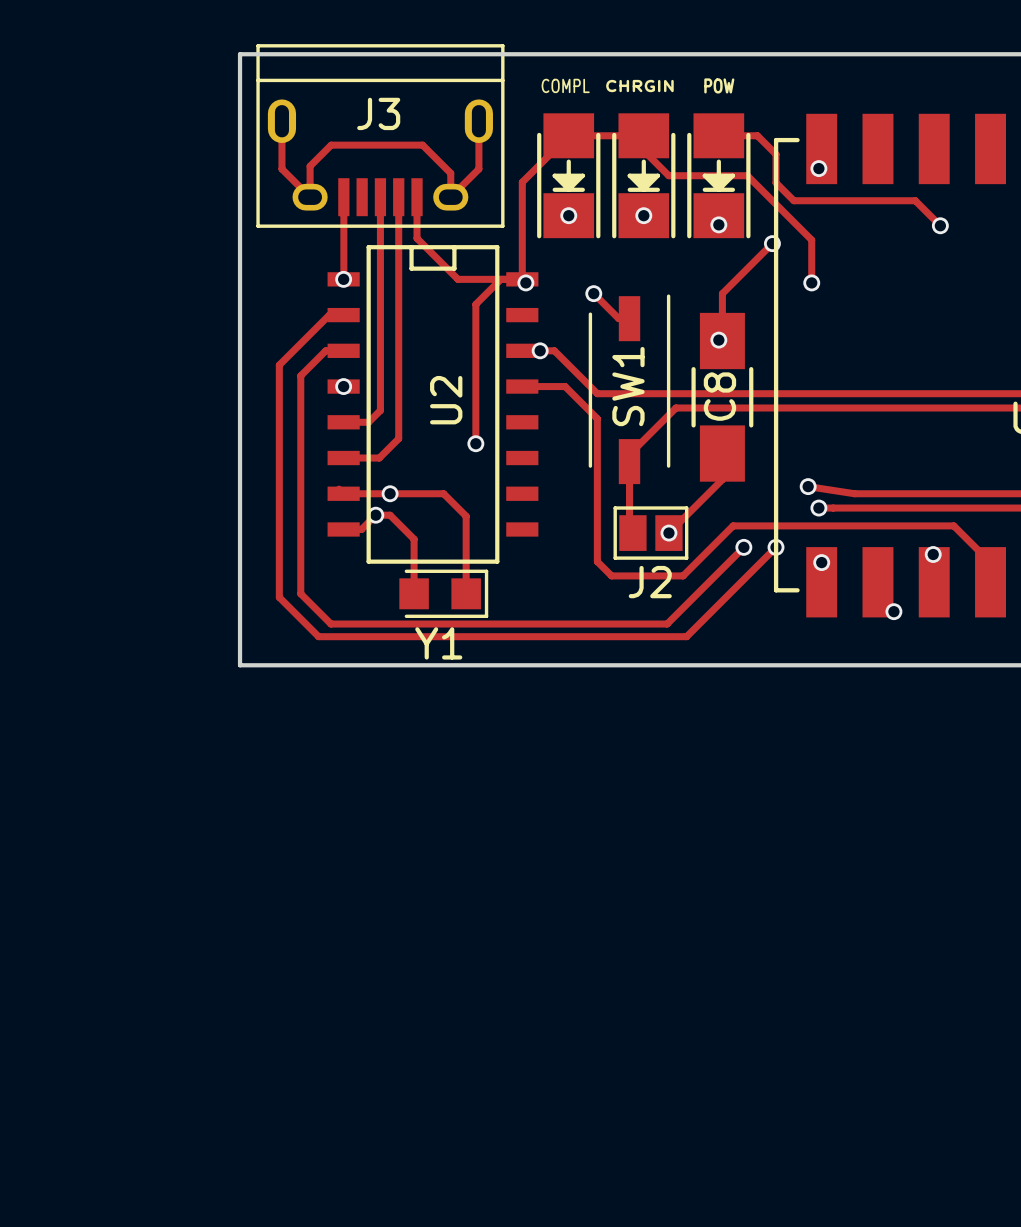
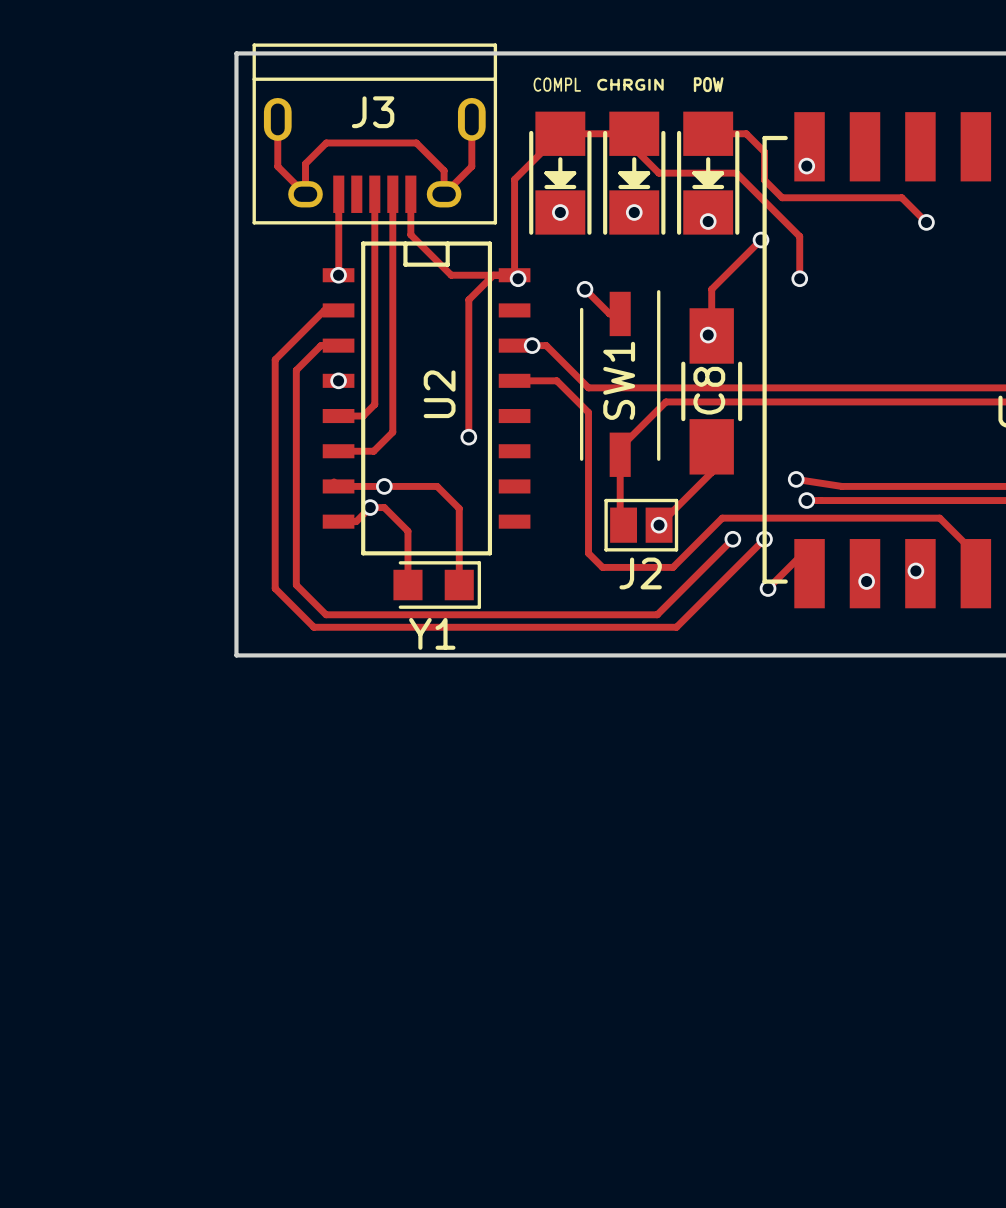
via: (933, 554) -> none
track: none -> (809, 554) (802, 554) (768, 588)
via: (821, 562) -> none
via: none -> (915, 570)
via: none -> (866, 581)
via: none -> (768, 588)
via: (893, 611) -> none

